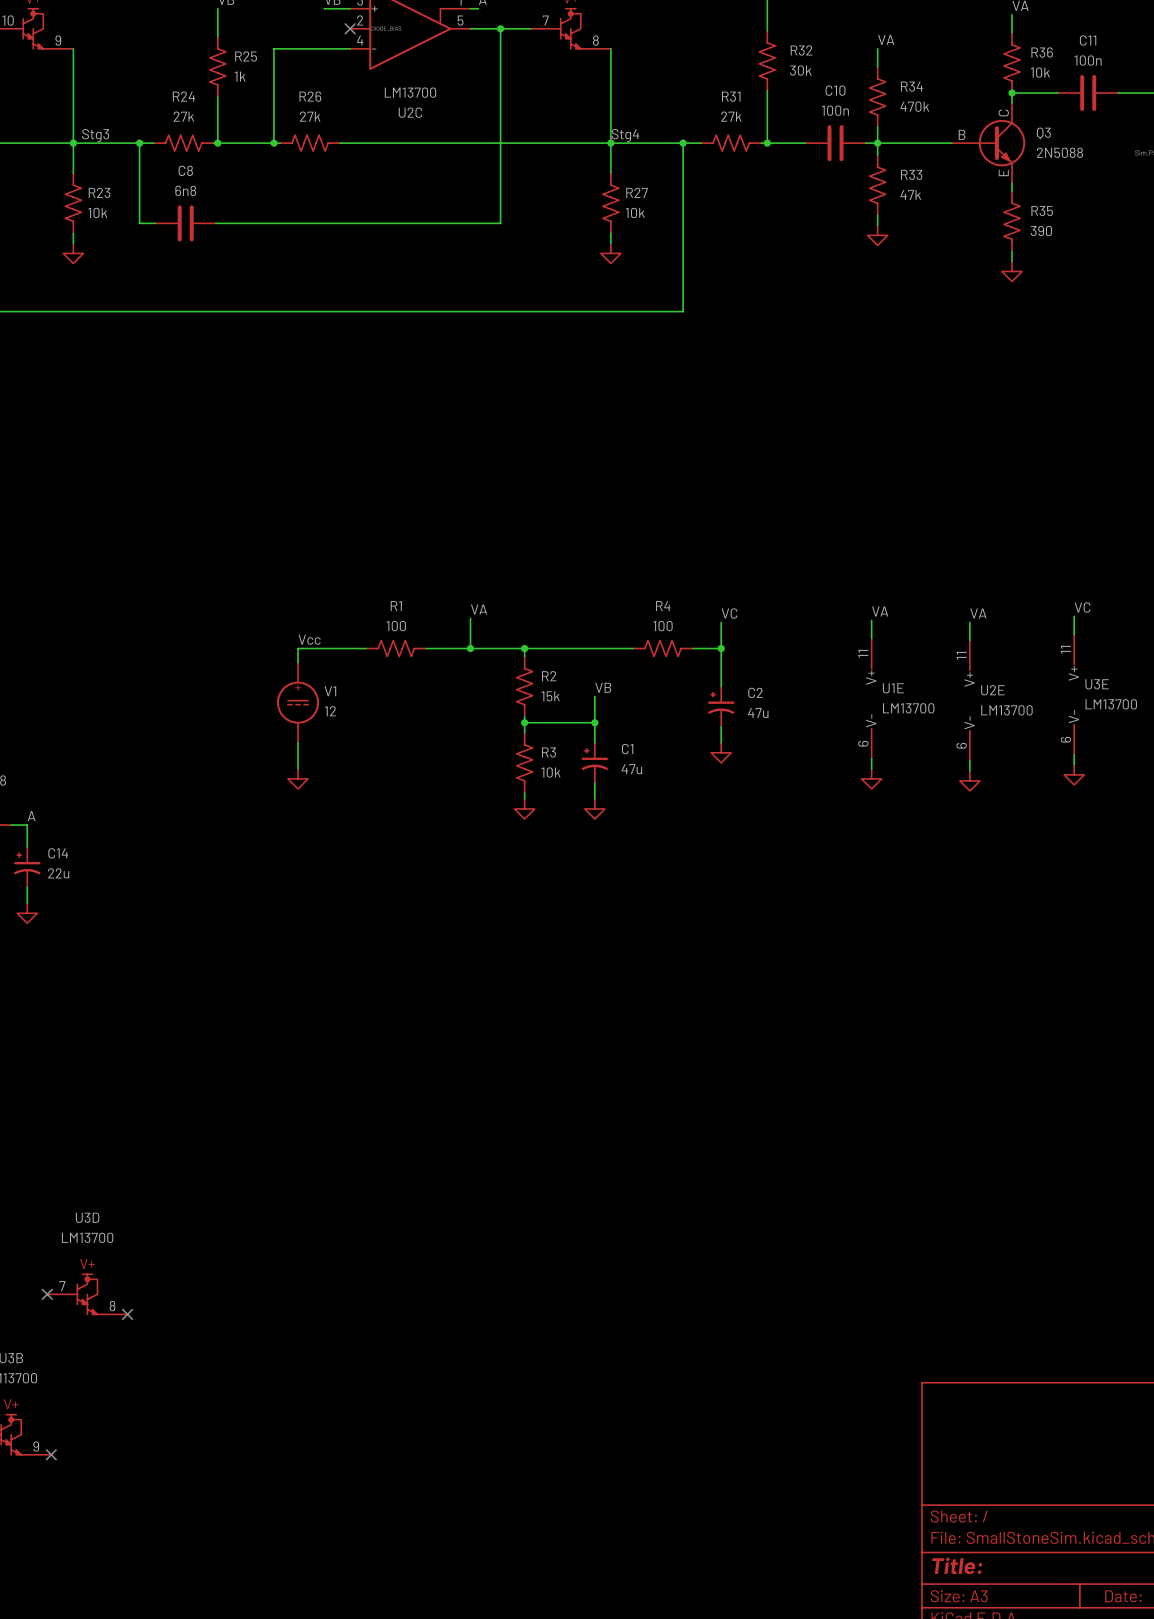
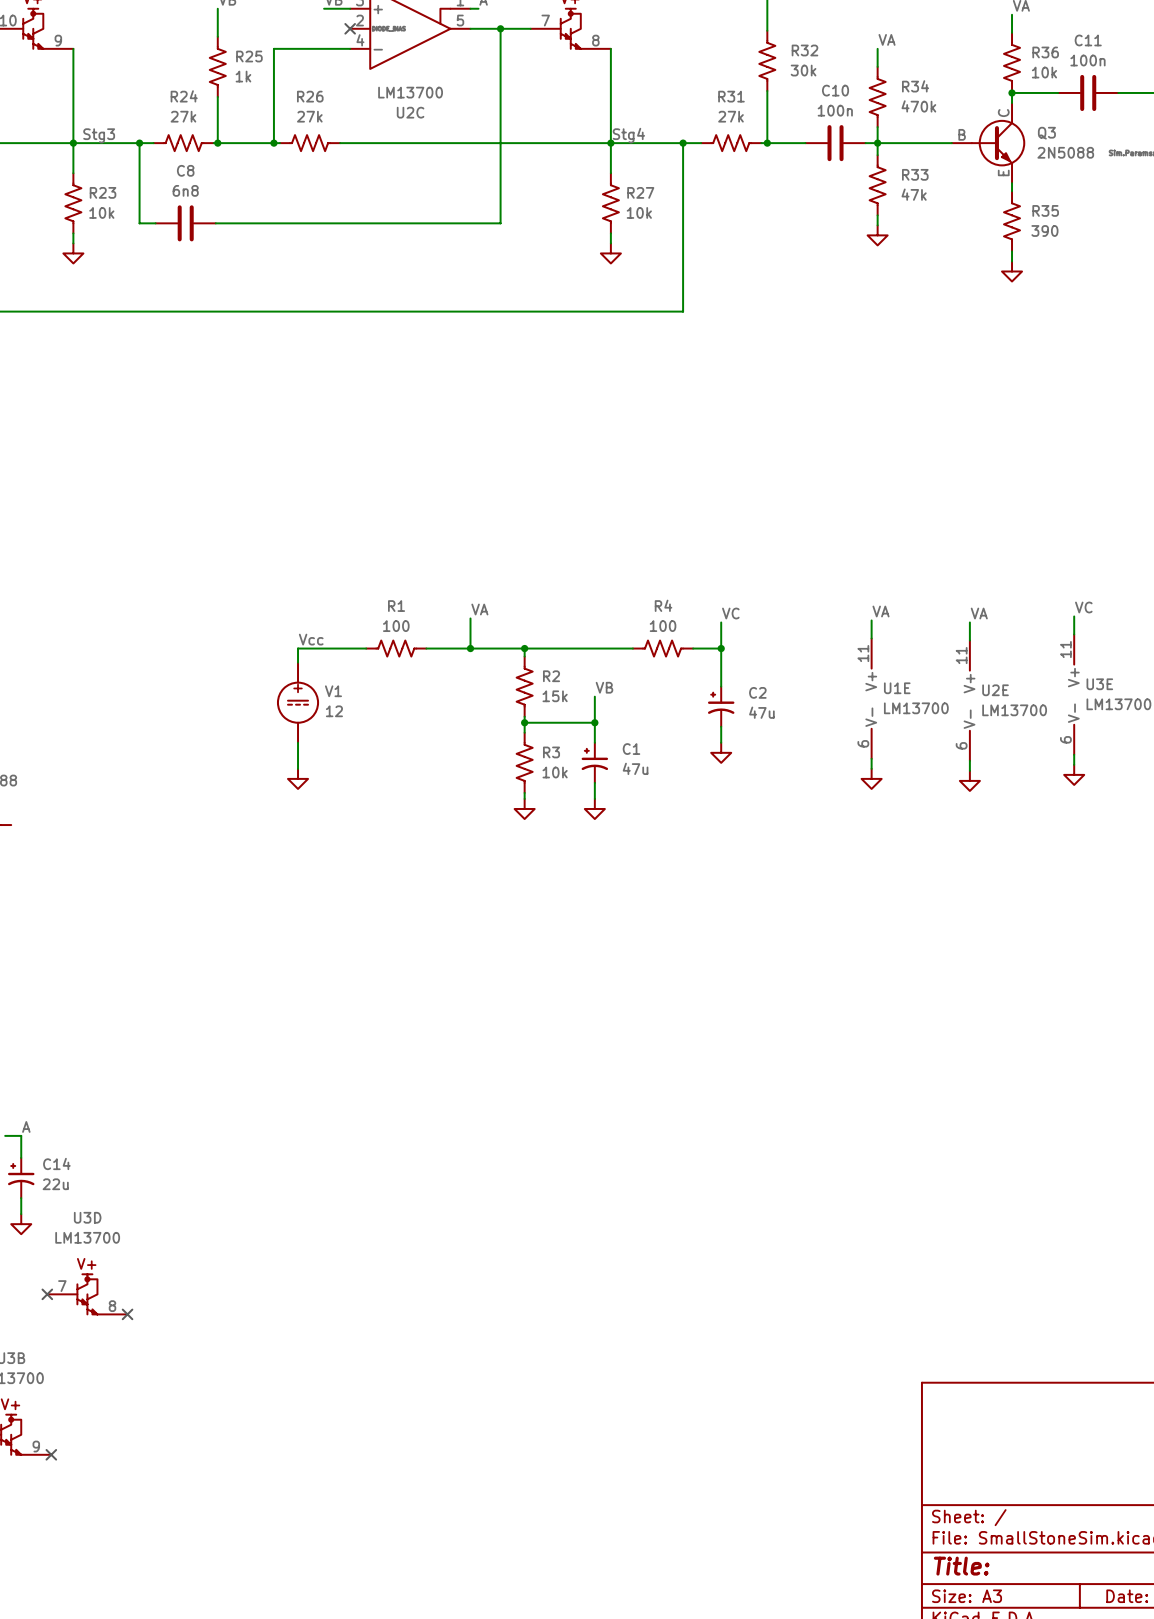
label: A (31, 816) -> none
wire: (11, 825) (27, 825) (27, 847) -> none
C14 position: (27, 867) -> (21, 1178)
wire: (27, 887) (27, 903) -> none
power symbol: (27, 913) -> none
label: none -> A (26, 1126)
wire: none -> (5, 1135) (21, 1135) (21, 1157)
wire: none -> (21, 1198) (21, 1214)
power symbol: none -> (21, 1224)

